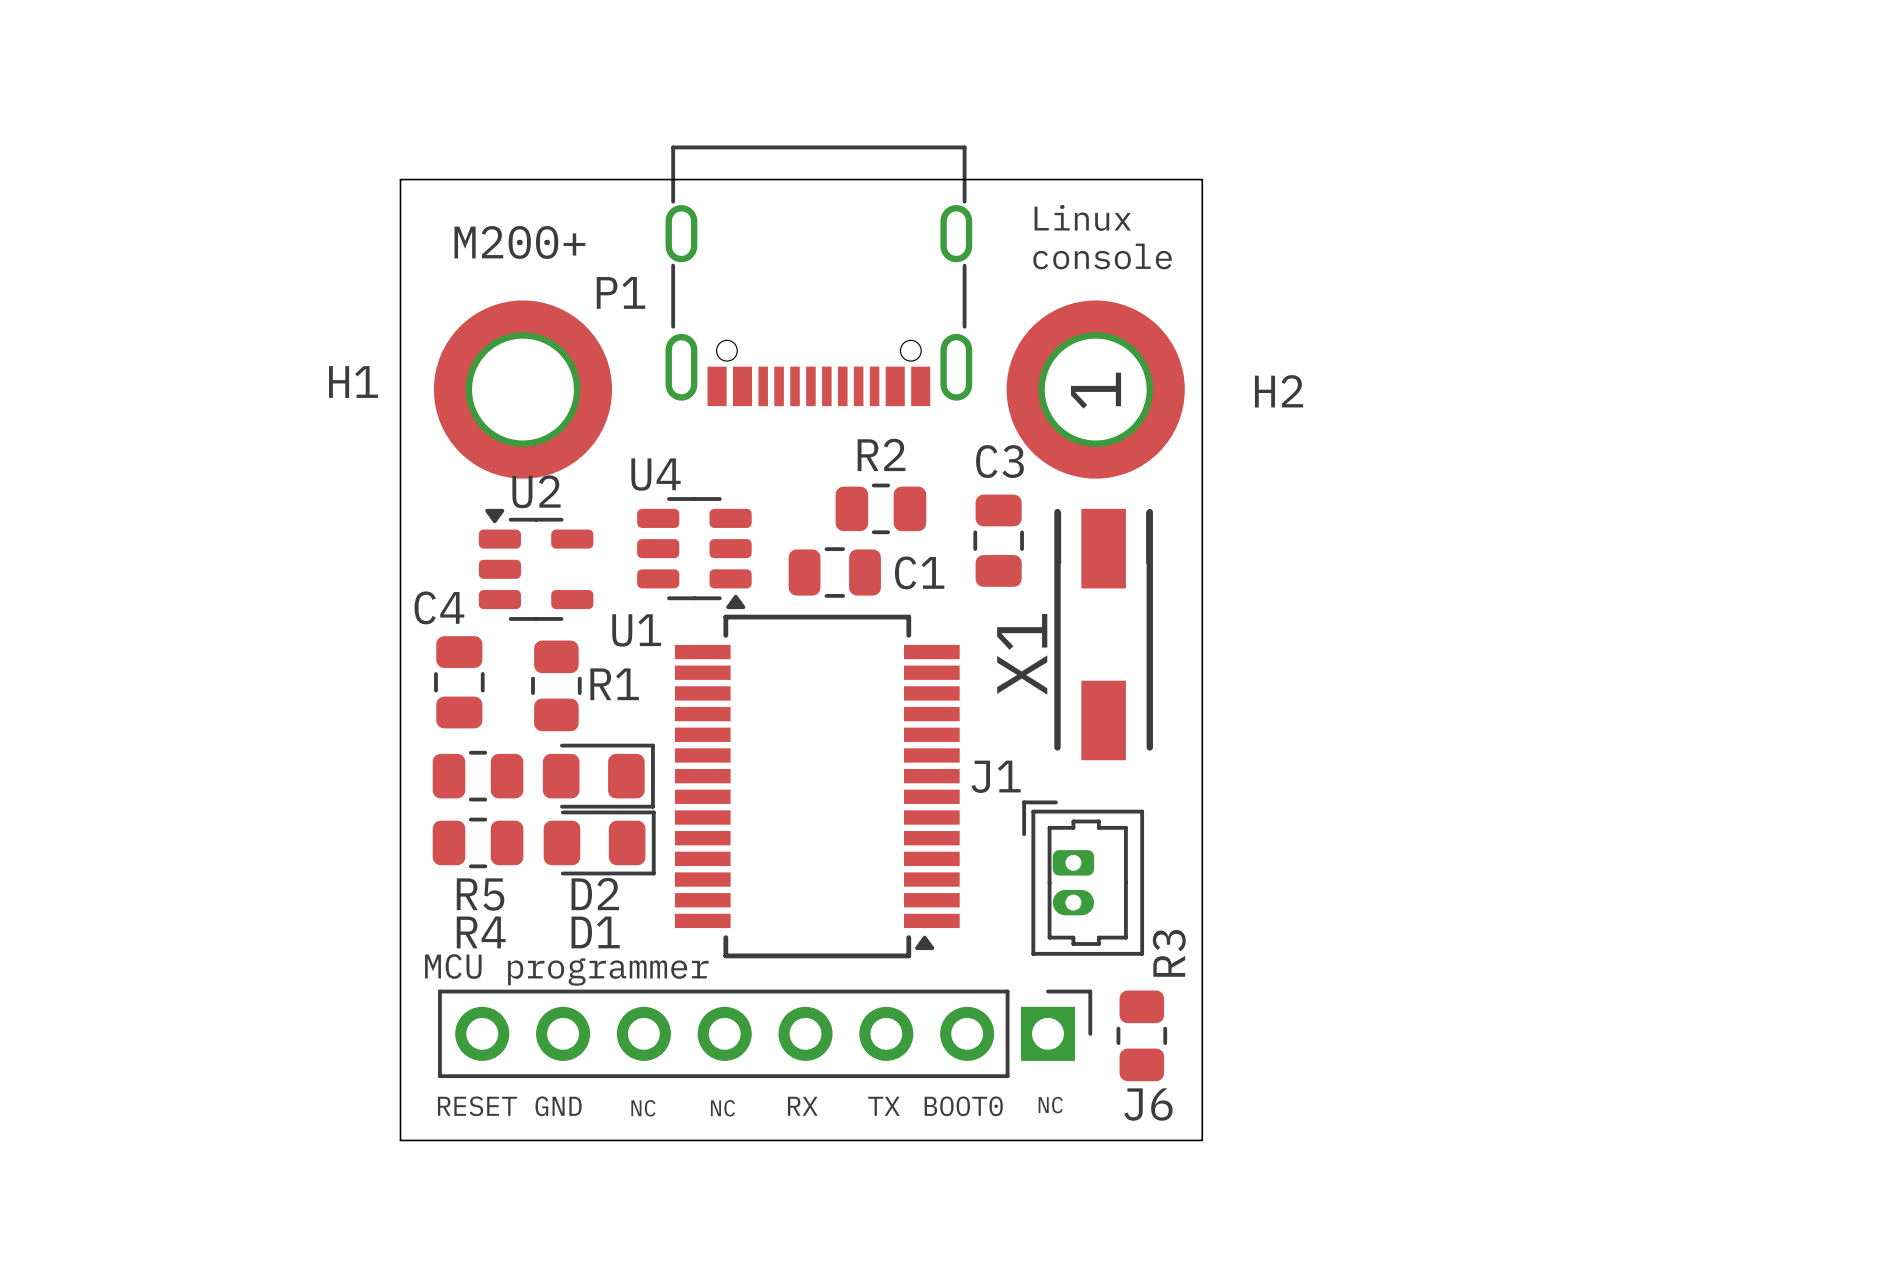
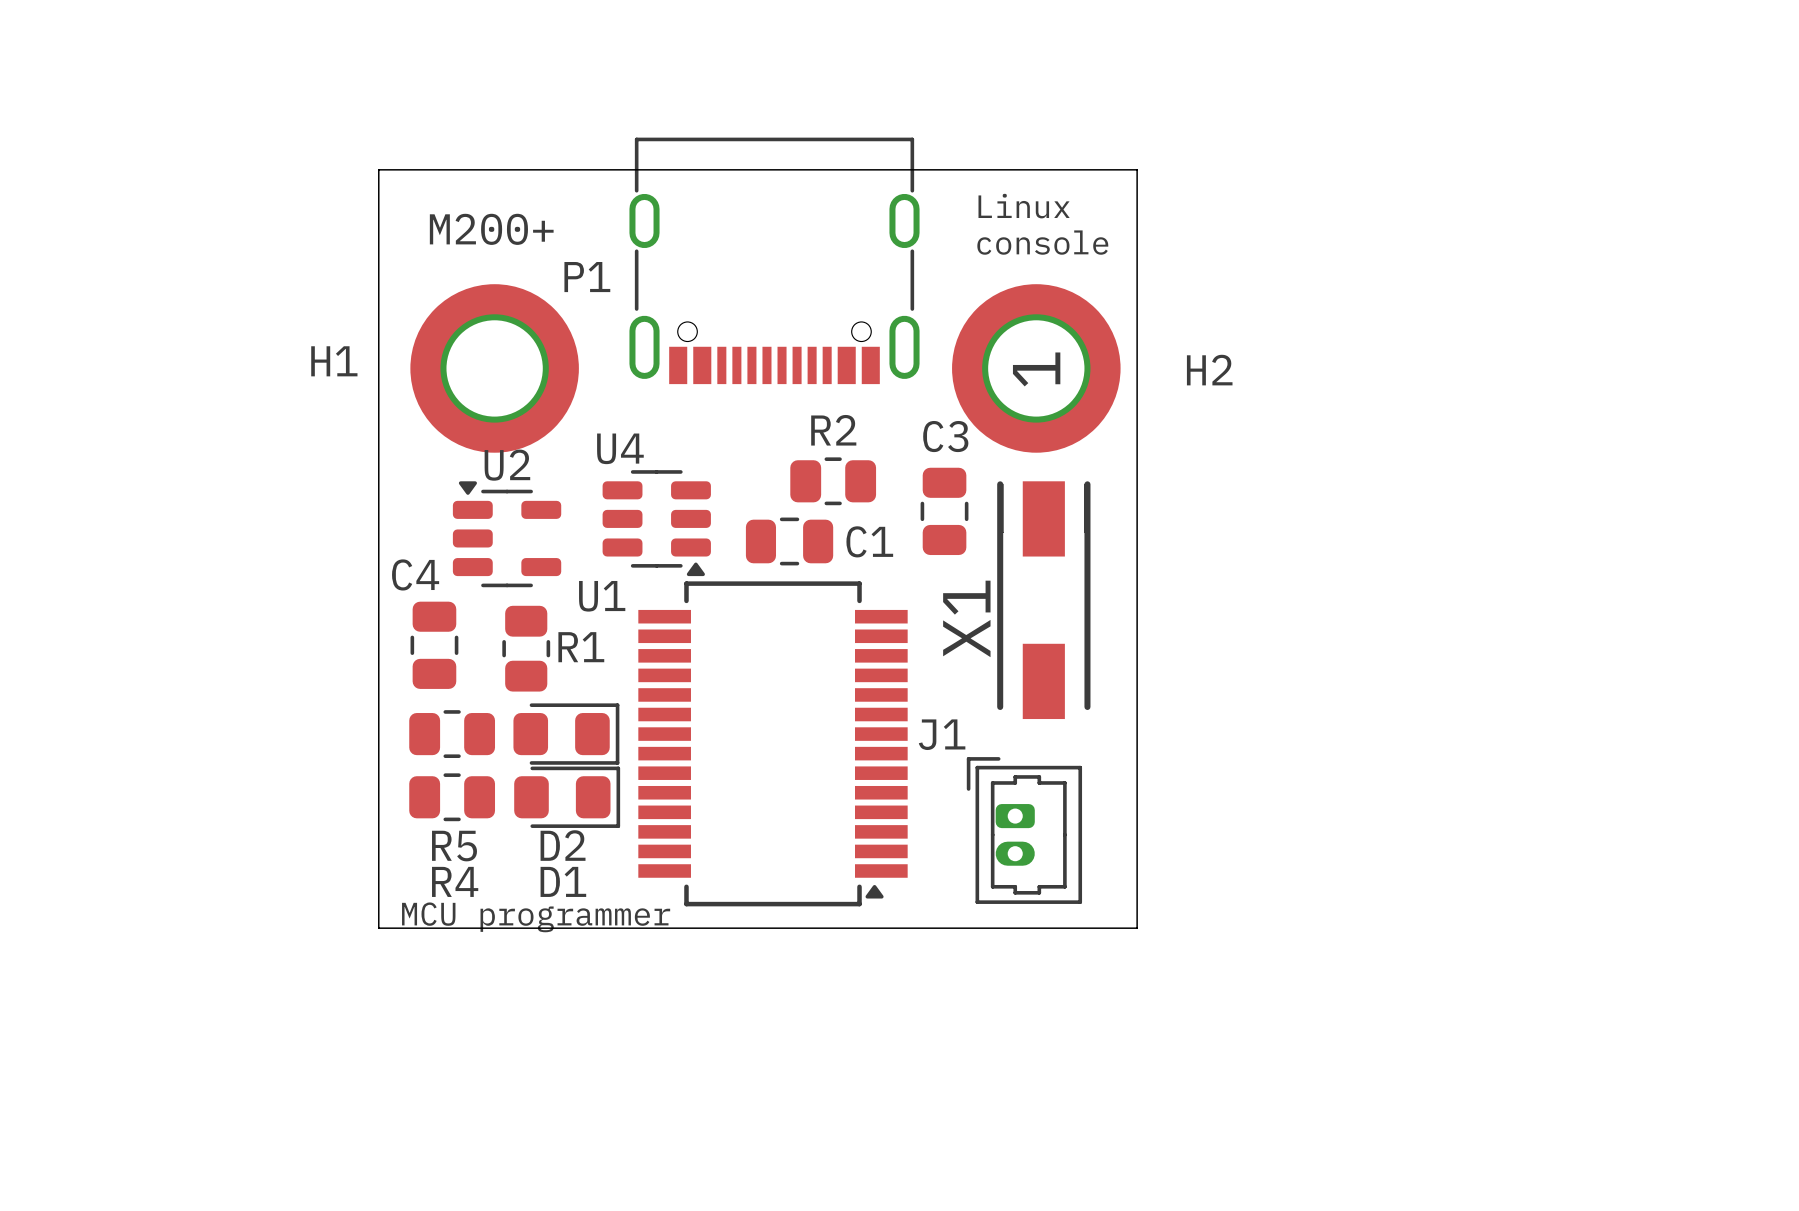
board edge: (400, 981) (400, 1140) (1202, 1140) (1202, 981) -> (378, 928) (1137, 928)
J6: (765, 1033) -> none
R3: (1141, 1035) -> none
text: NC (1050, 1105) -> none
text: RESET GND (509, 1106) -> none
text: RX TX (843, 1106) -> none
text: BOOT0 (963, 1106) -> none
text: NC (643, 1108) -> none
text: NC (722, 1108) -> none

